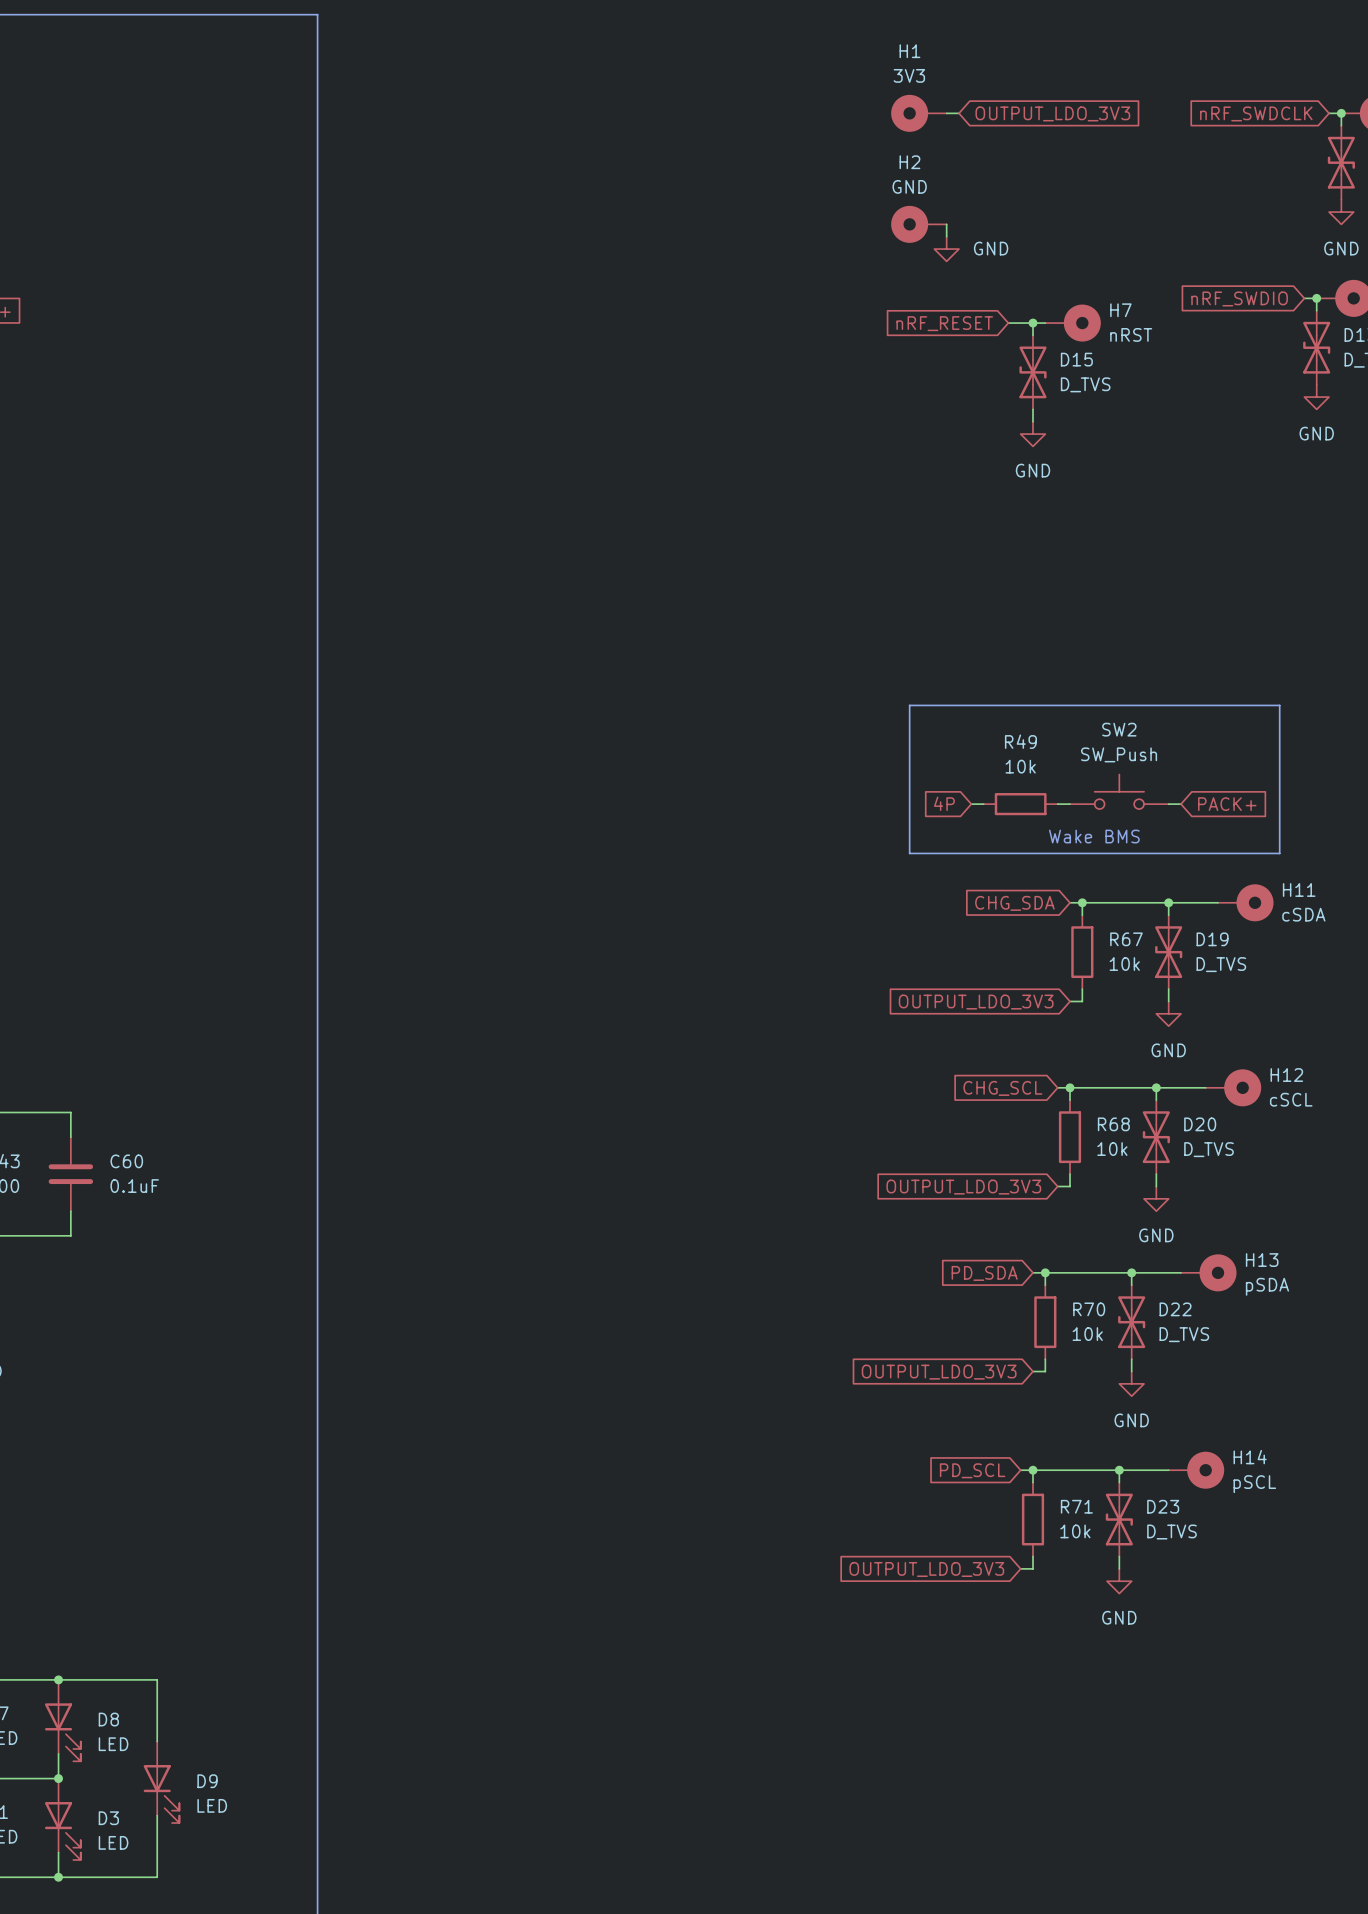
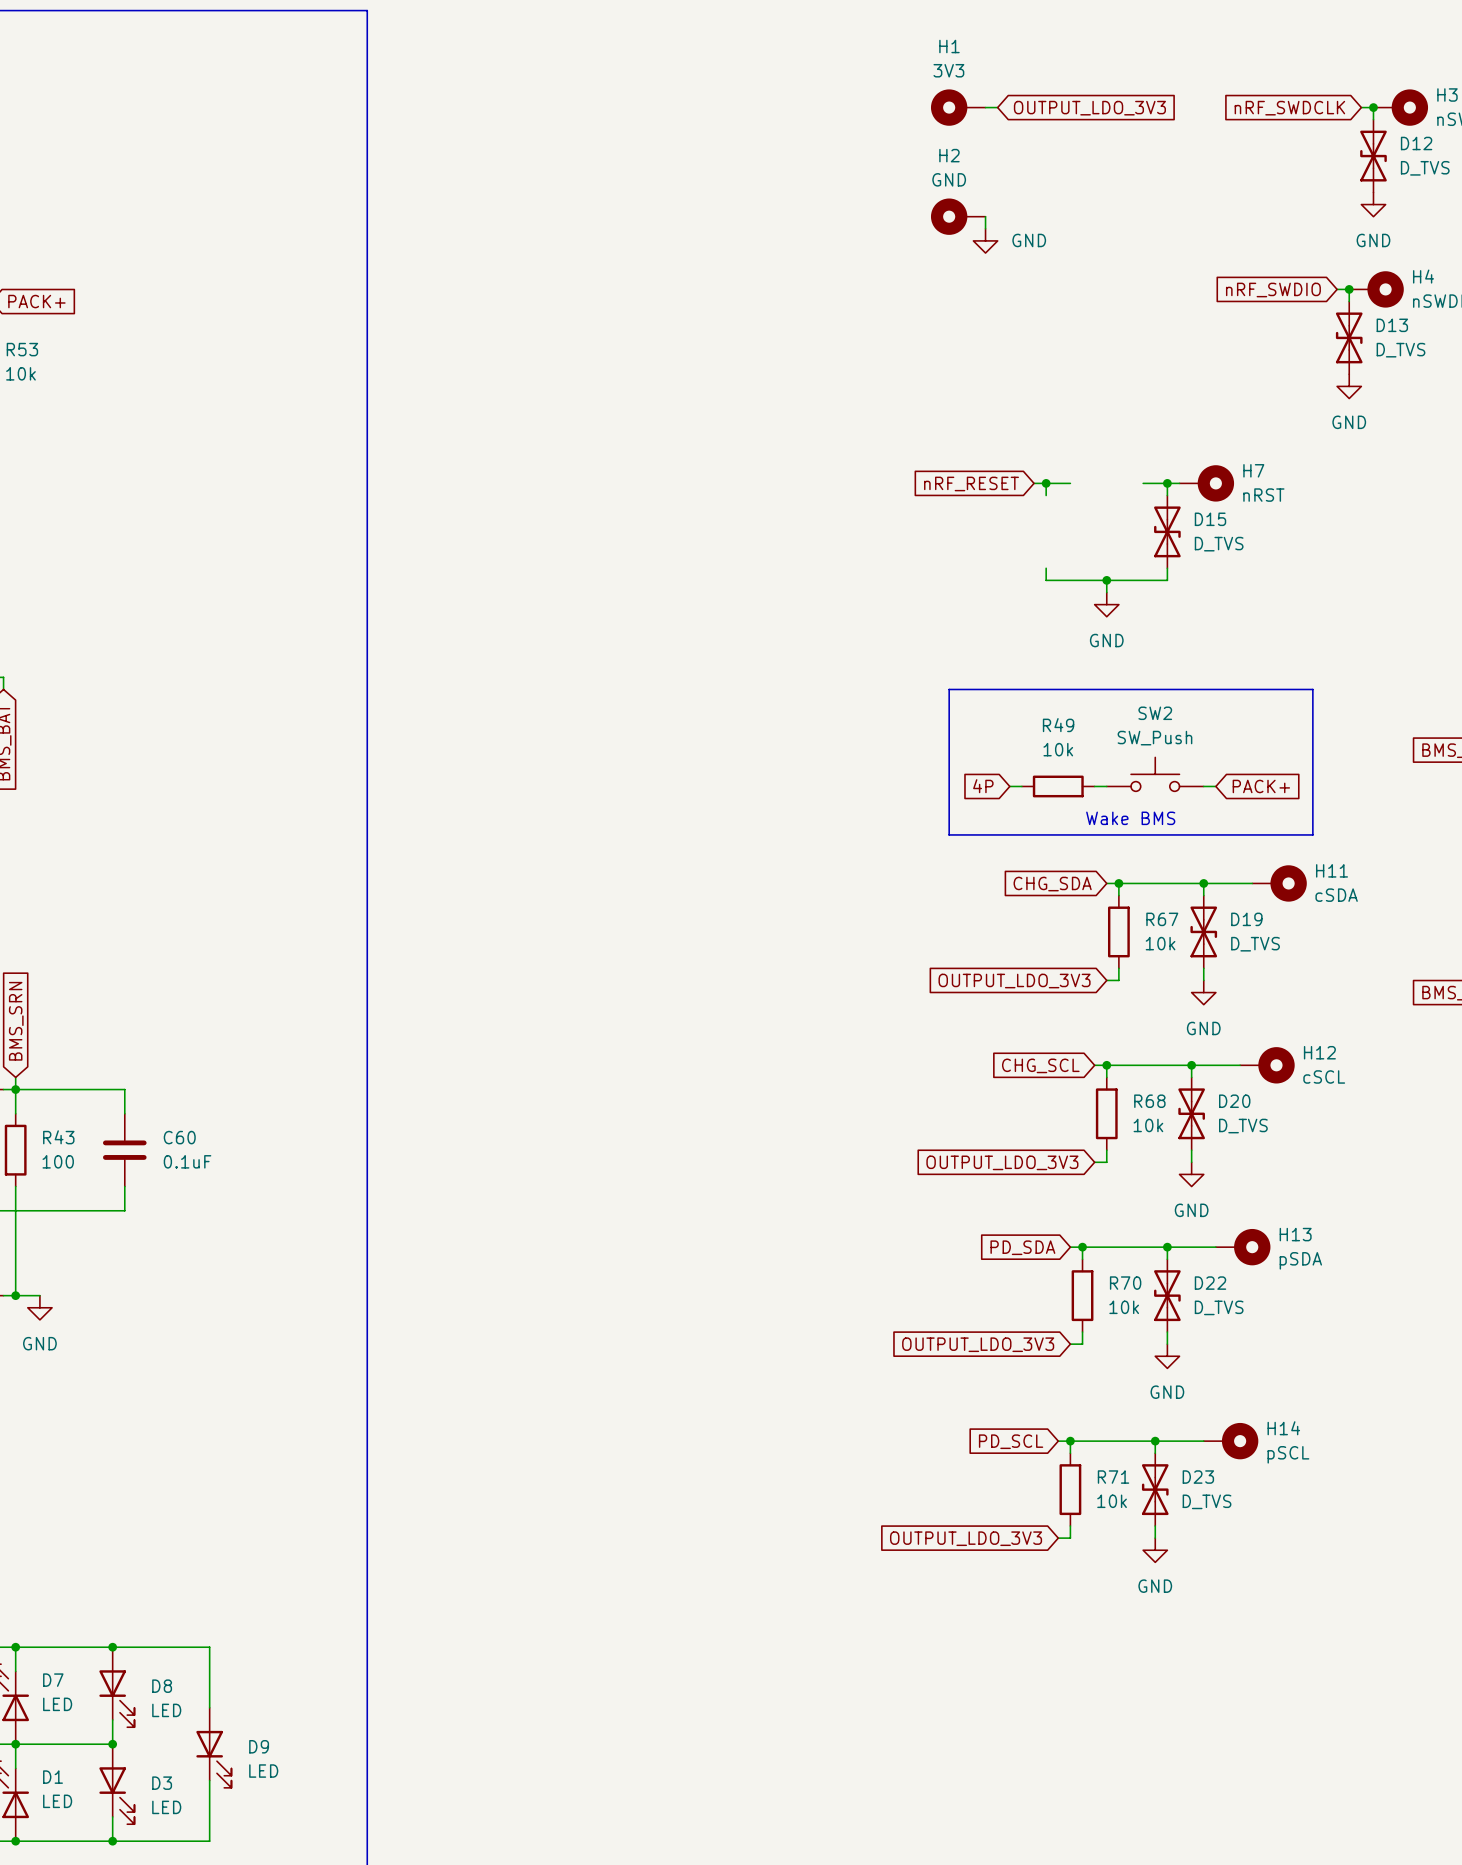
global label position: nRF_RESET (944, 323) -> nRF_RESET (971, 483)
wire: (1008, 323) (1045, 323) -> (1143, 483) (1179, 483)
wire: (1033, 323) (1033, 335) -> (1167, 483) (1167, 495)
junction: (1033, 323) -> none
H7 position: (1073, 323) -> (1206, 483)
D15 position: (1033, 372) -> (1167, 531)
wire: (1033, 409) (1033, 421) -> (1046, 483) (1046, 495)
power symbol position: GND (1033, 434) -> GND (1106, 604)
wire: none -> (1034, 483) (1070, 483)
junction: none -> (1046, 483)
junction: none -> (1167, 483)
wire: none -> (1046, 568) (1046, 580) (1167, 580) (1167, 568)
wire: none -> (1106, 580) (1106, 592)
junction: none -> (1106, 580)

